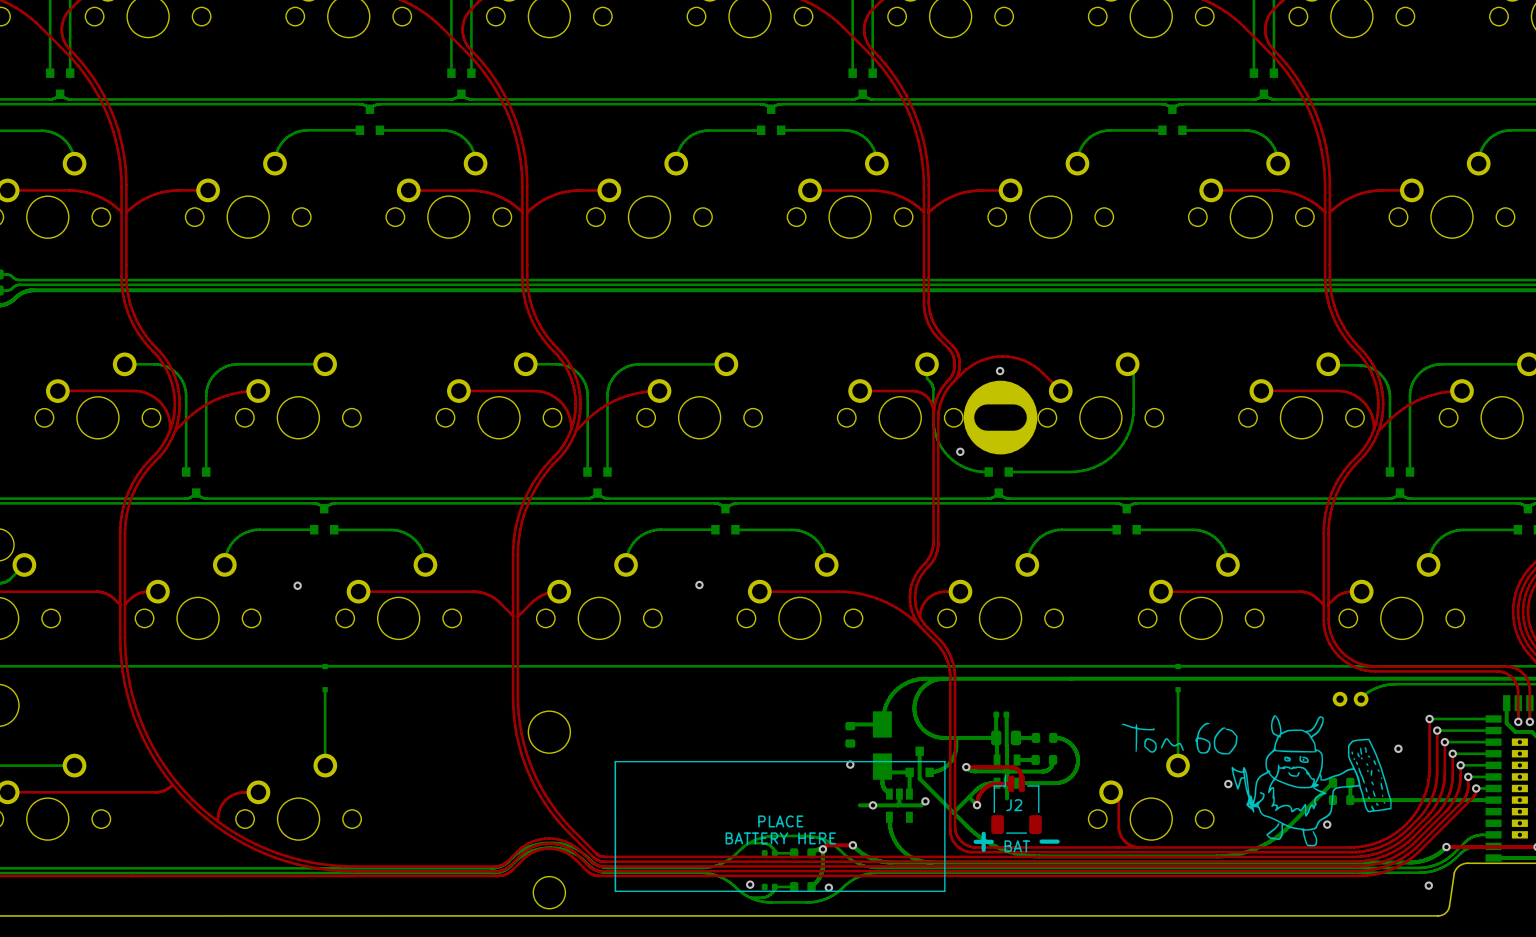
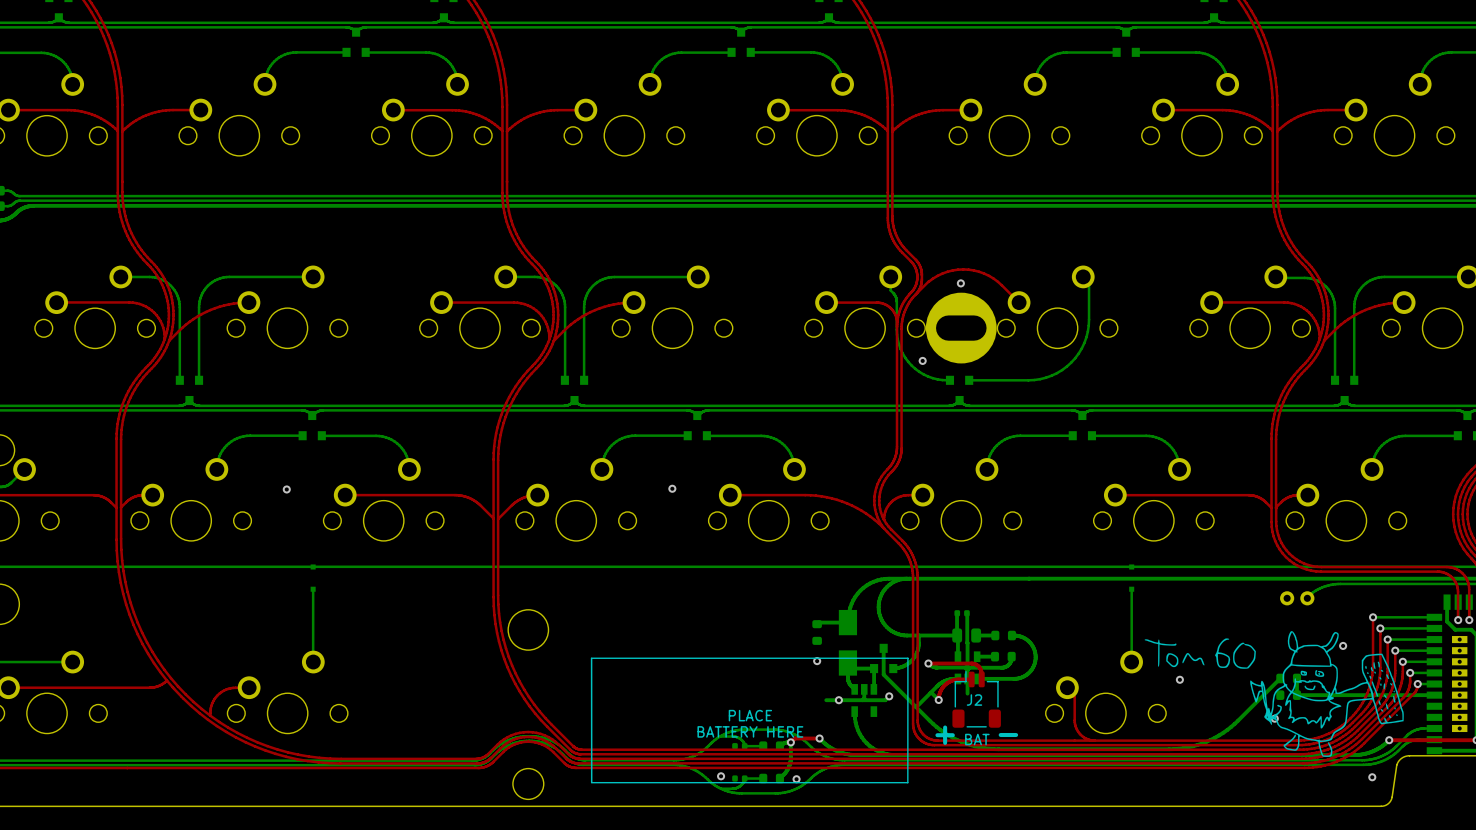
drawing position: (1256, 780) -> (1274, 694)

